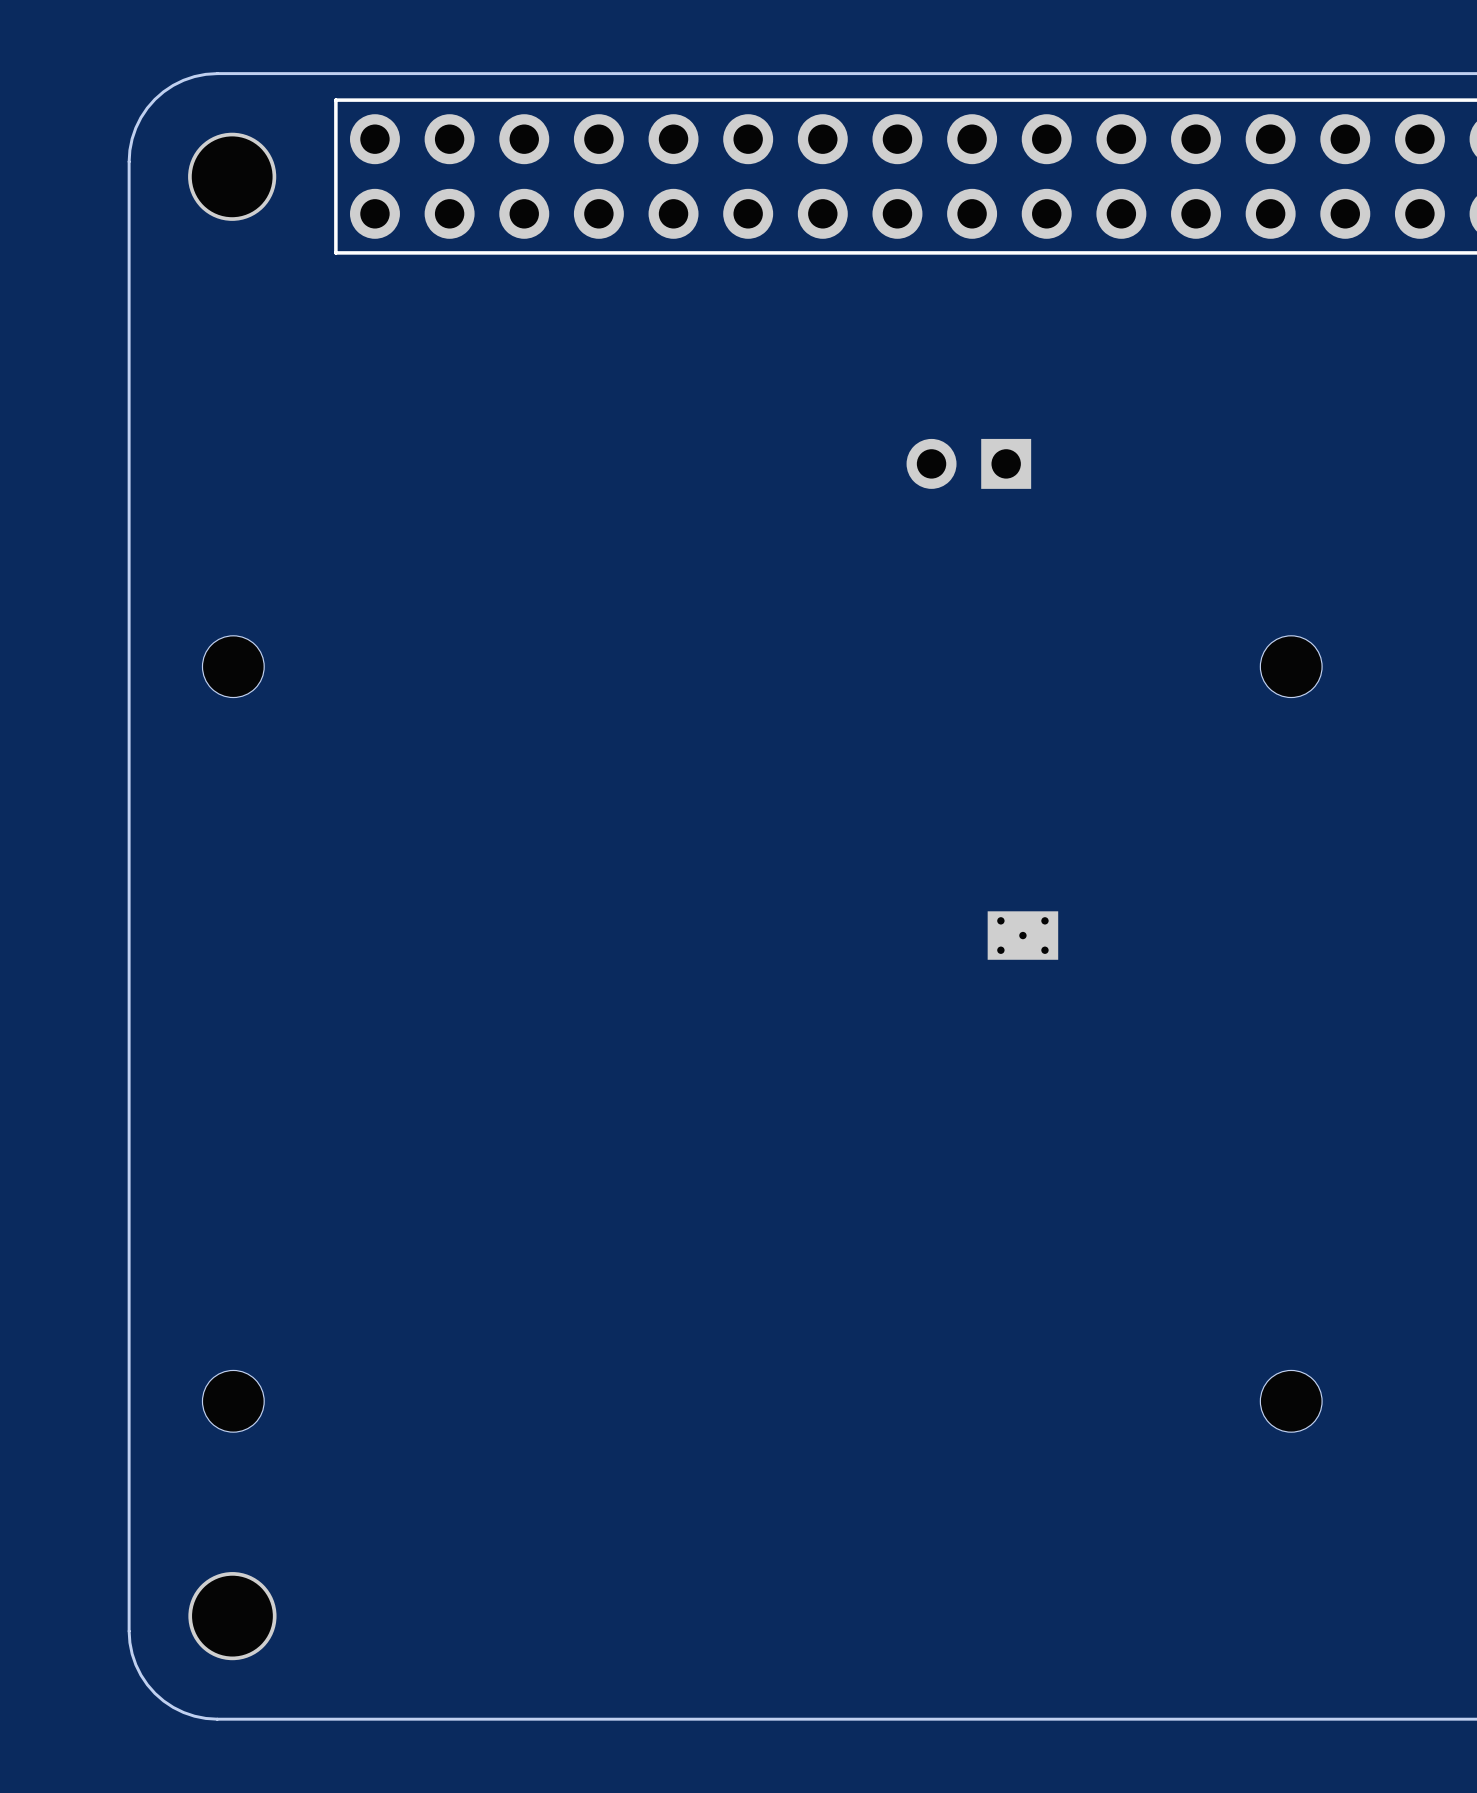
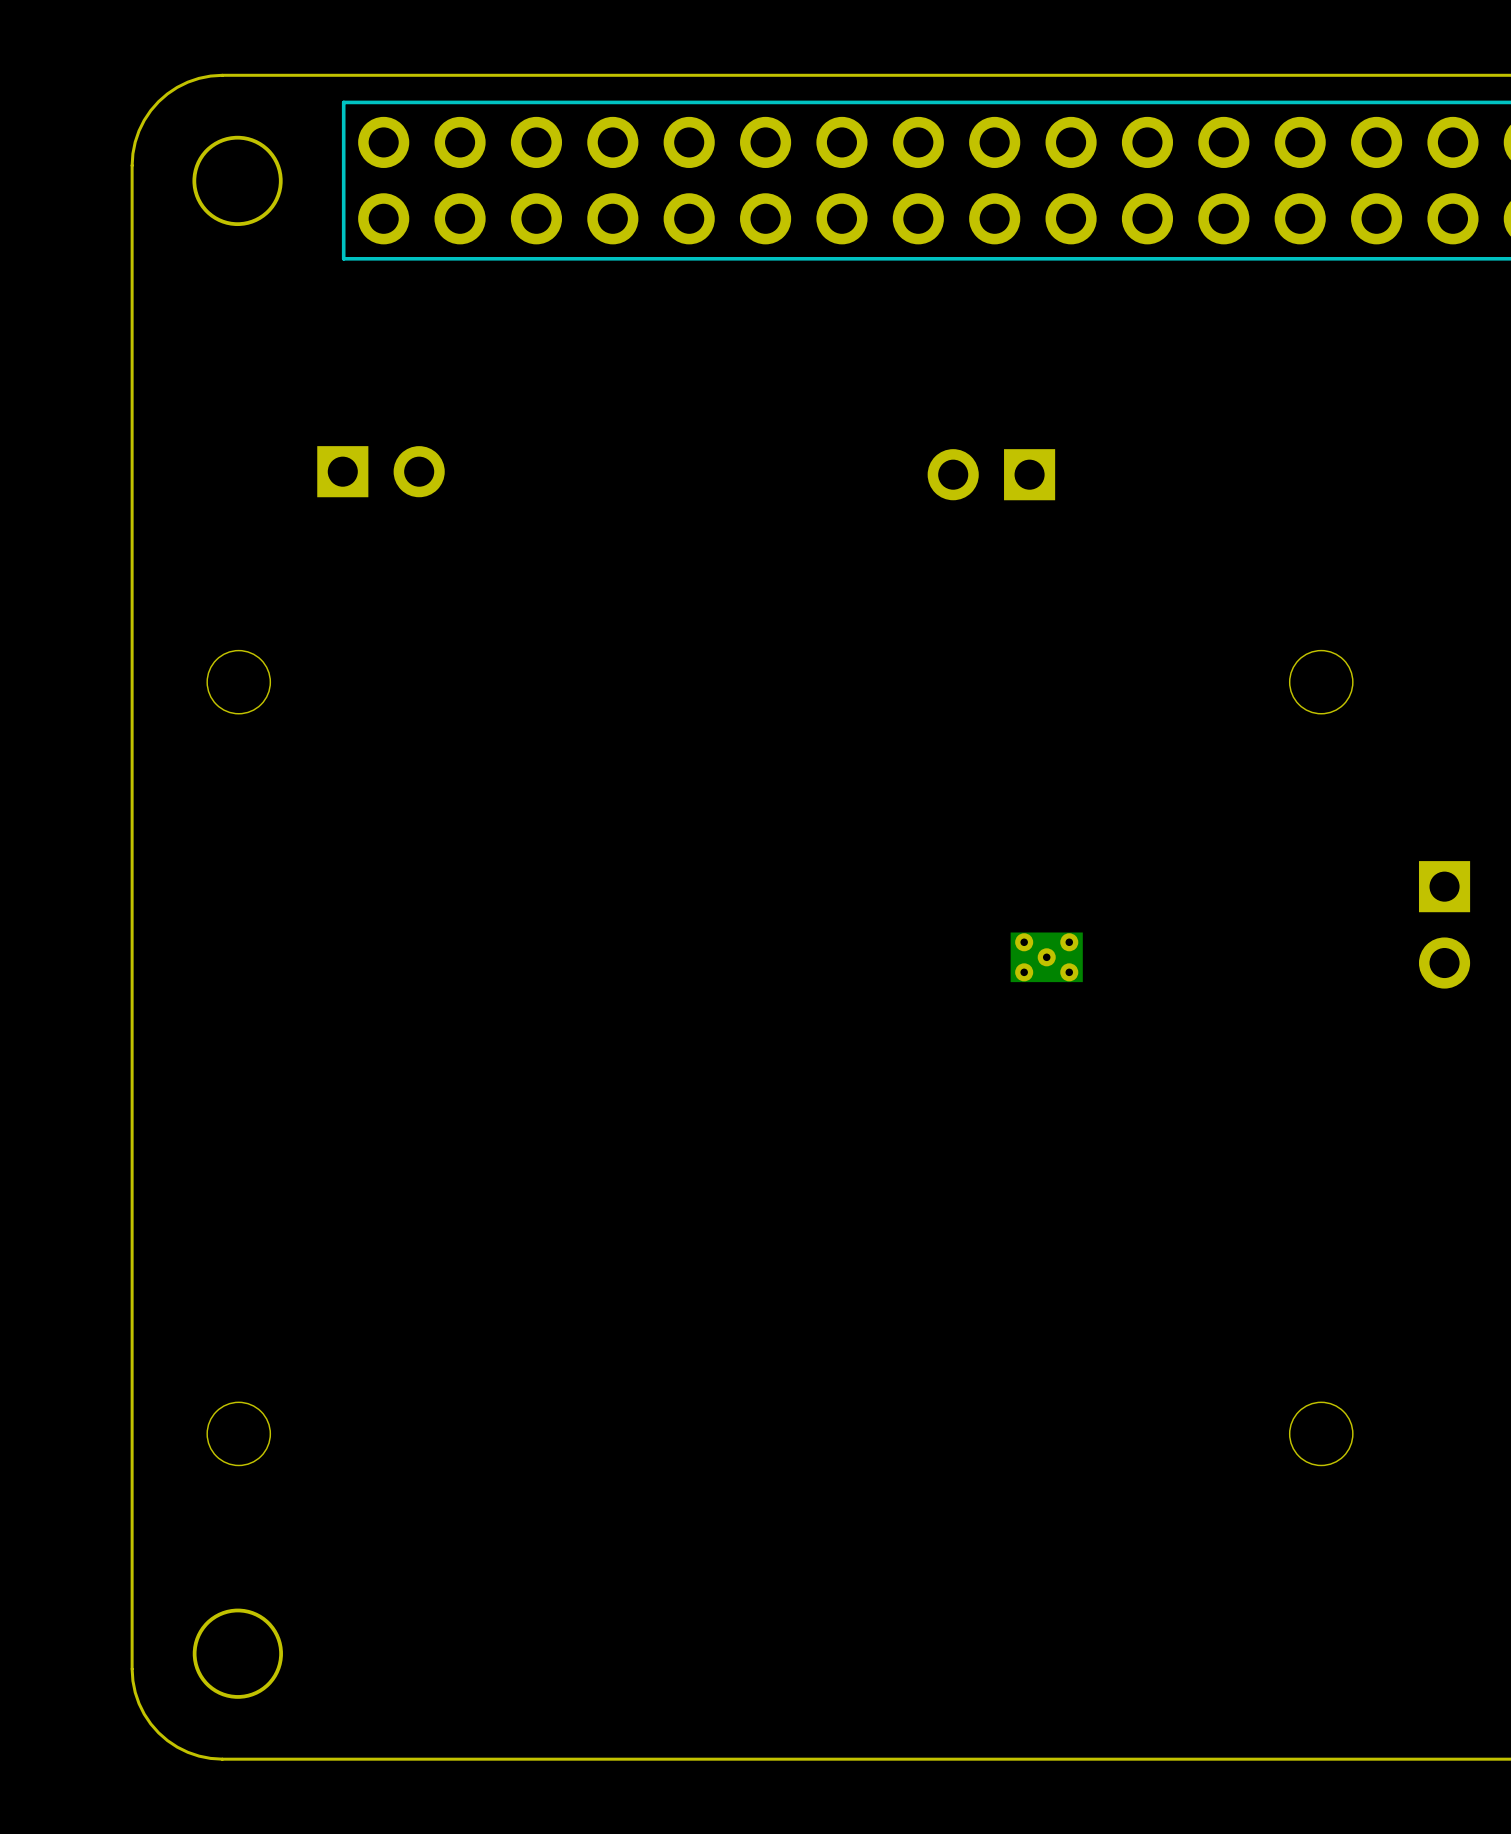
part: none -> (380, 471)
part: none -> (1444, 924)

